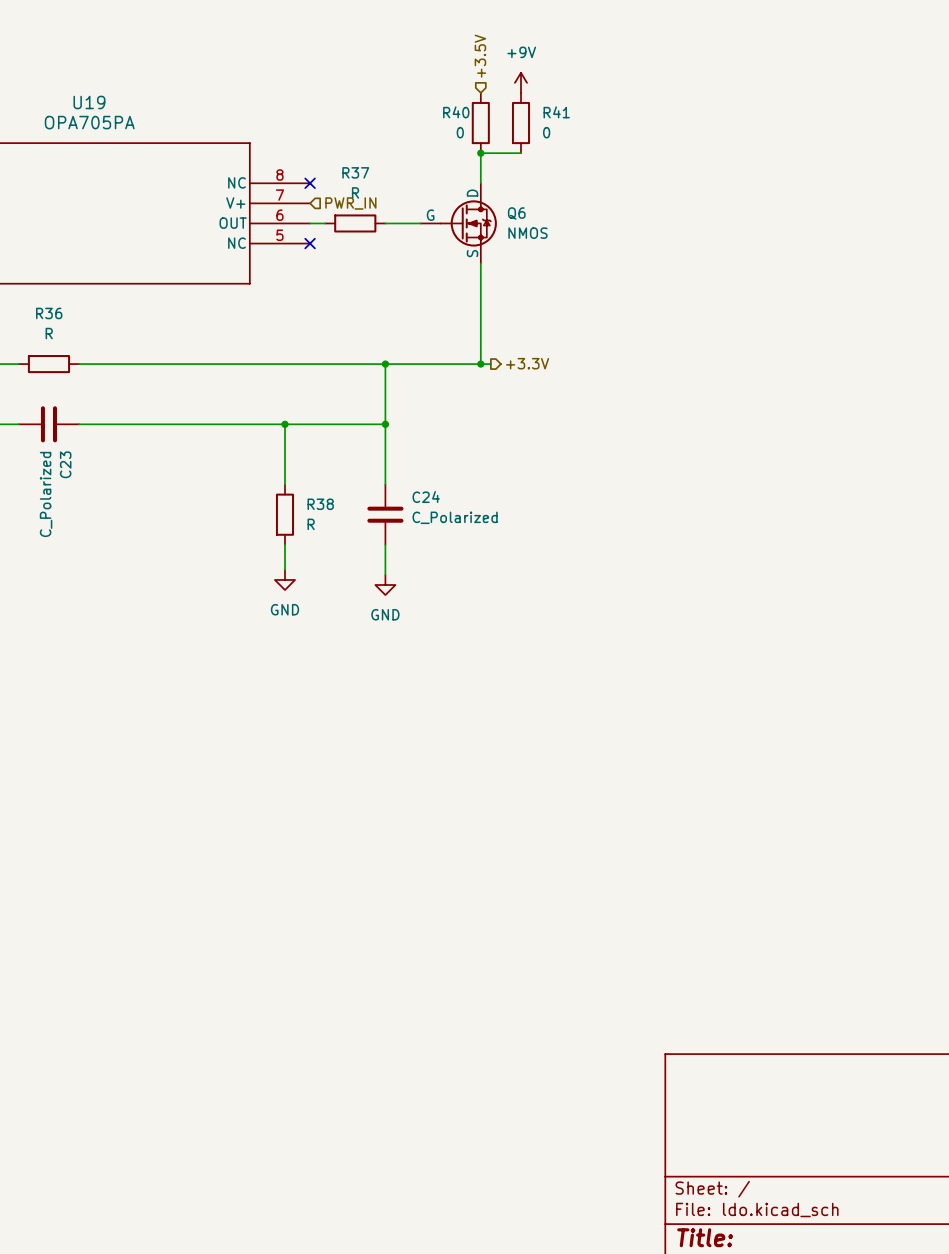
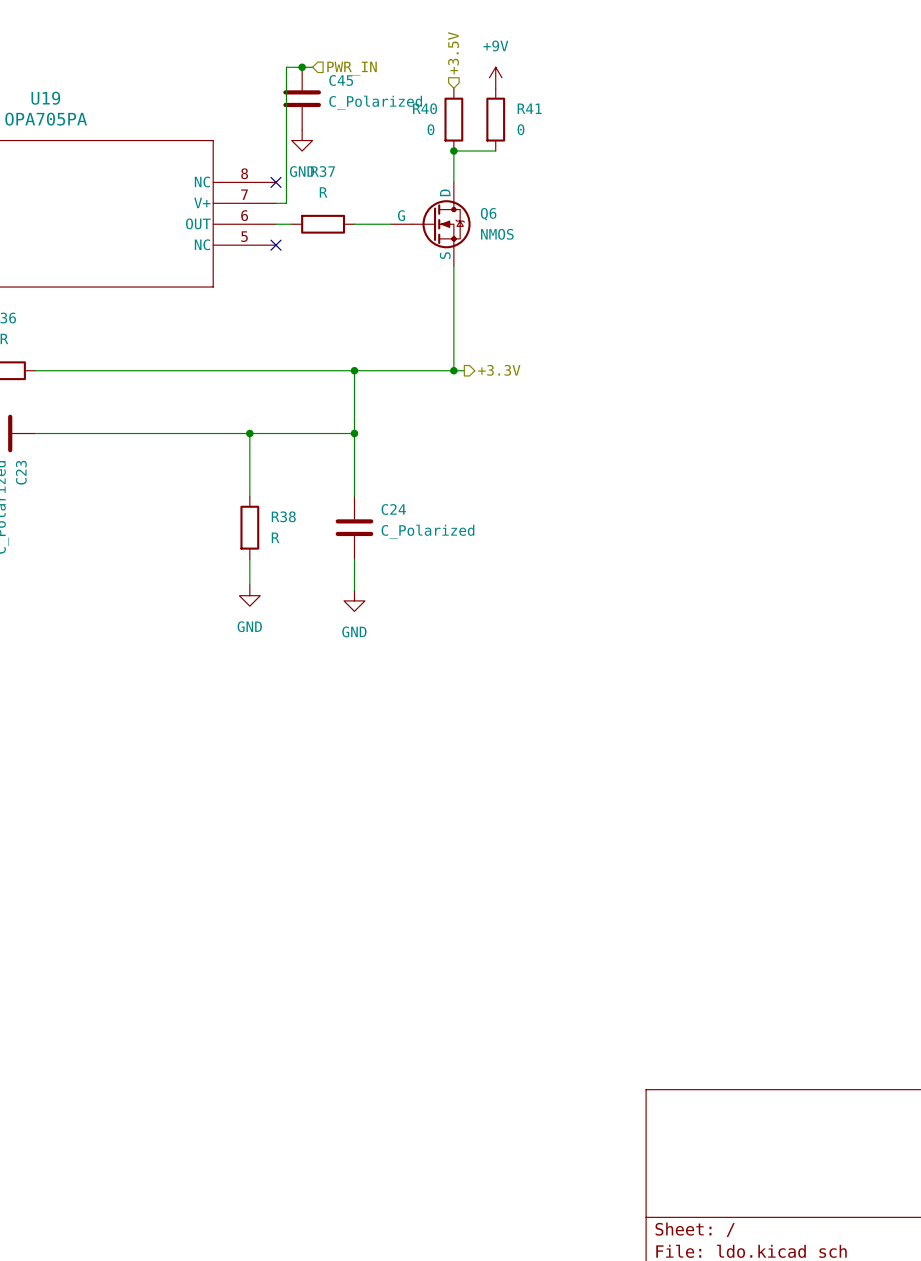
junction: none -> (302, 67)
wire: none -> (312, 67) (286, 67) (286, 203) (275, 203)
C45: none -> C_Polarized (302, 98)
power symbol: none -> GND (302, 140)
hierarchical label position: PWR_IN (350, 203) -> PWR_IN (352, 68)

